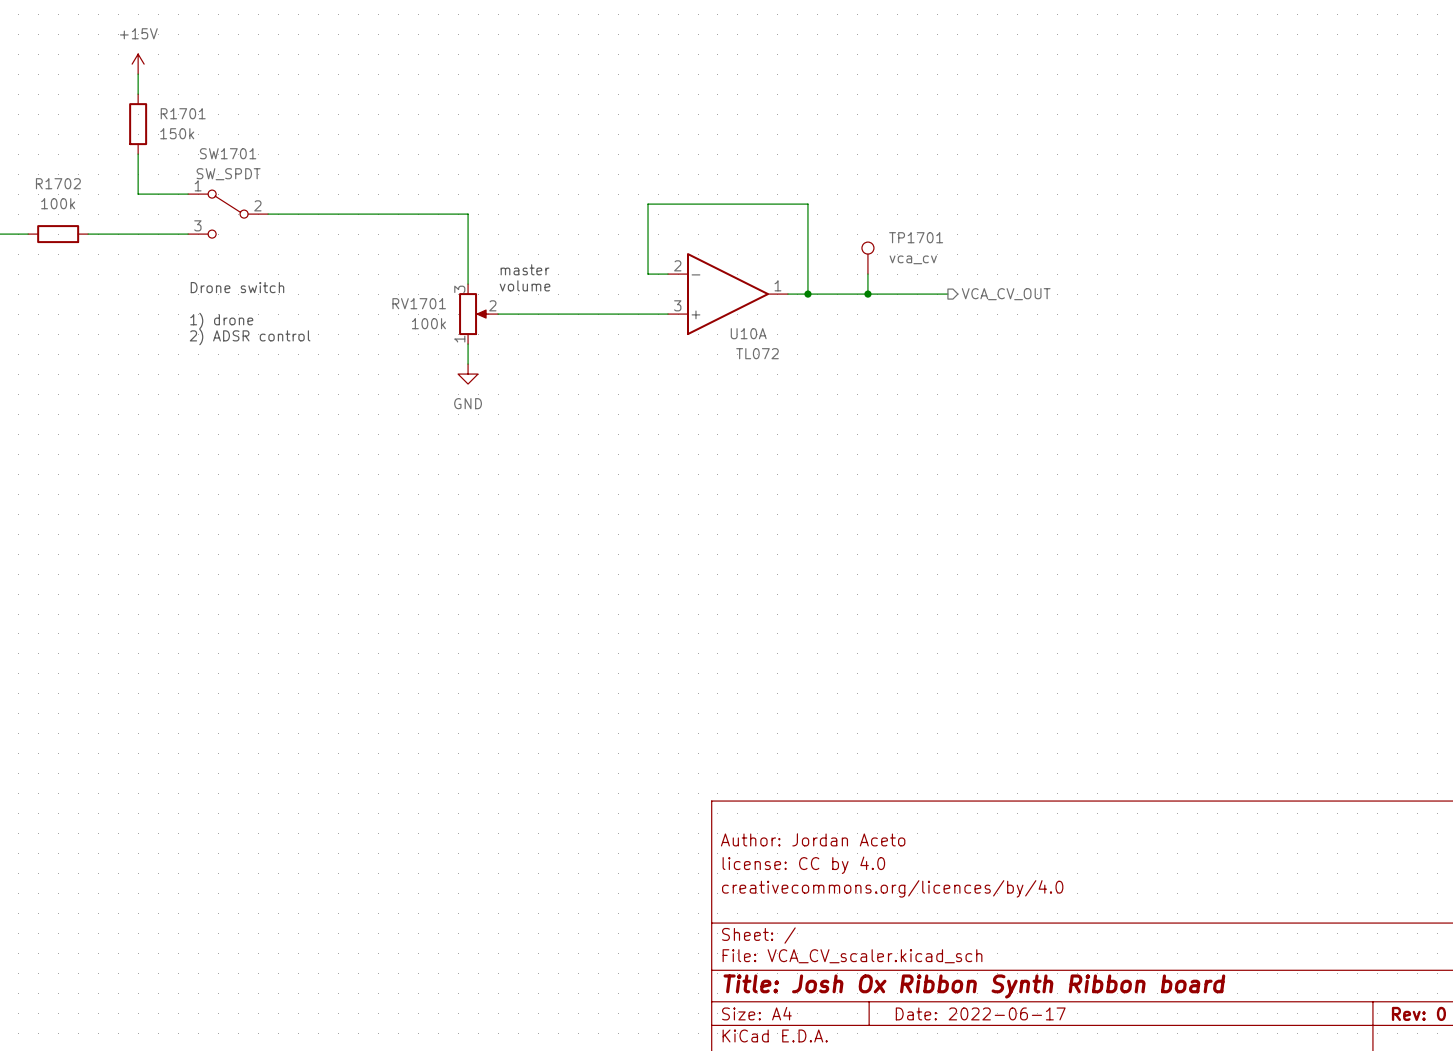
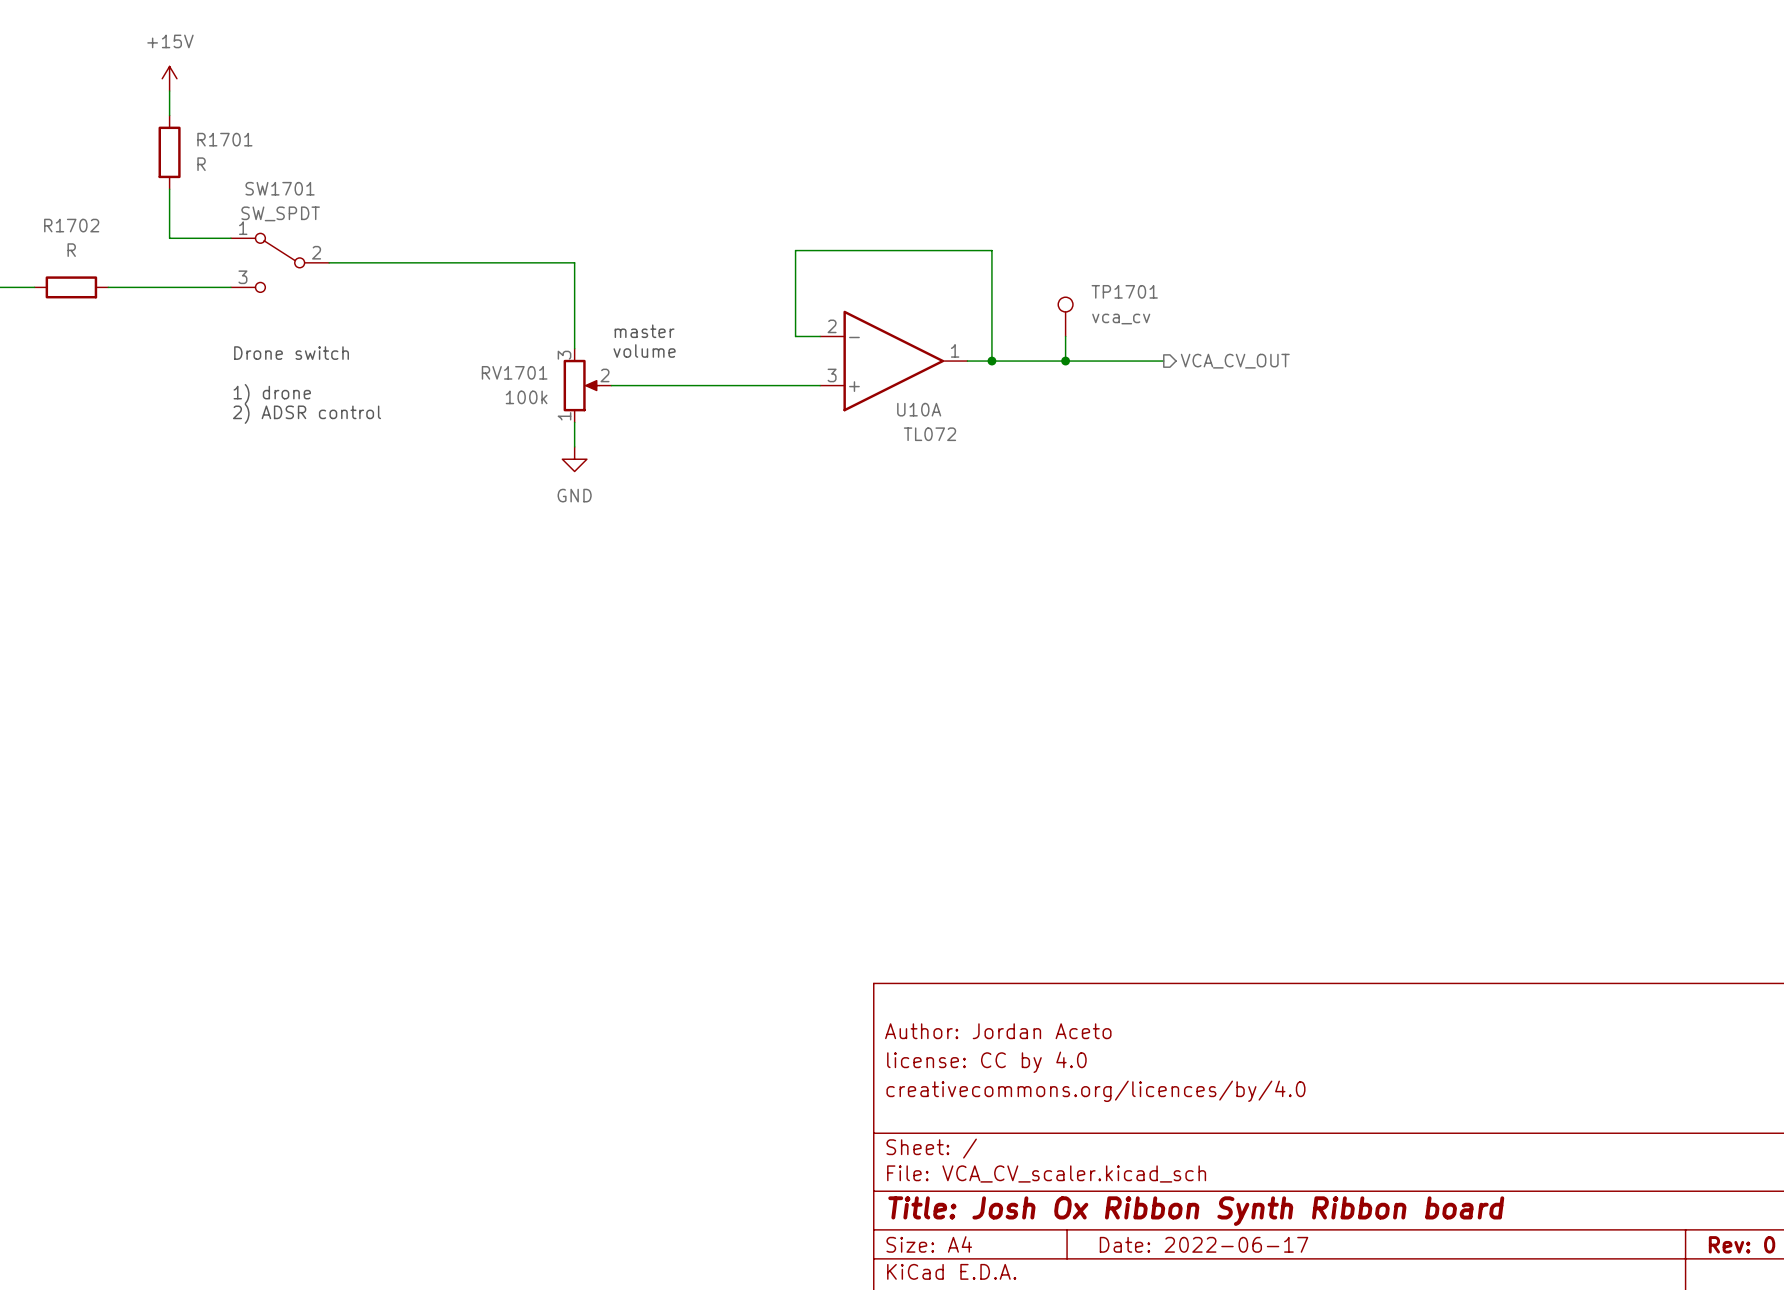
R1701 value: 150k (177, 133) -> R (201, 164)
R1702 value: 100k (58, 203) -> R (71, 250)

